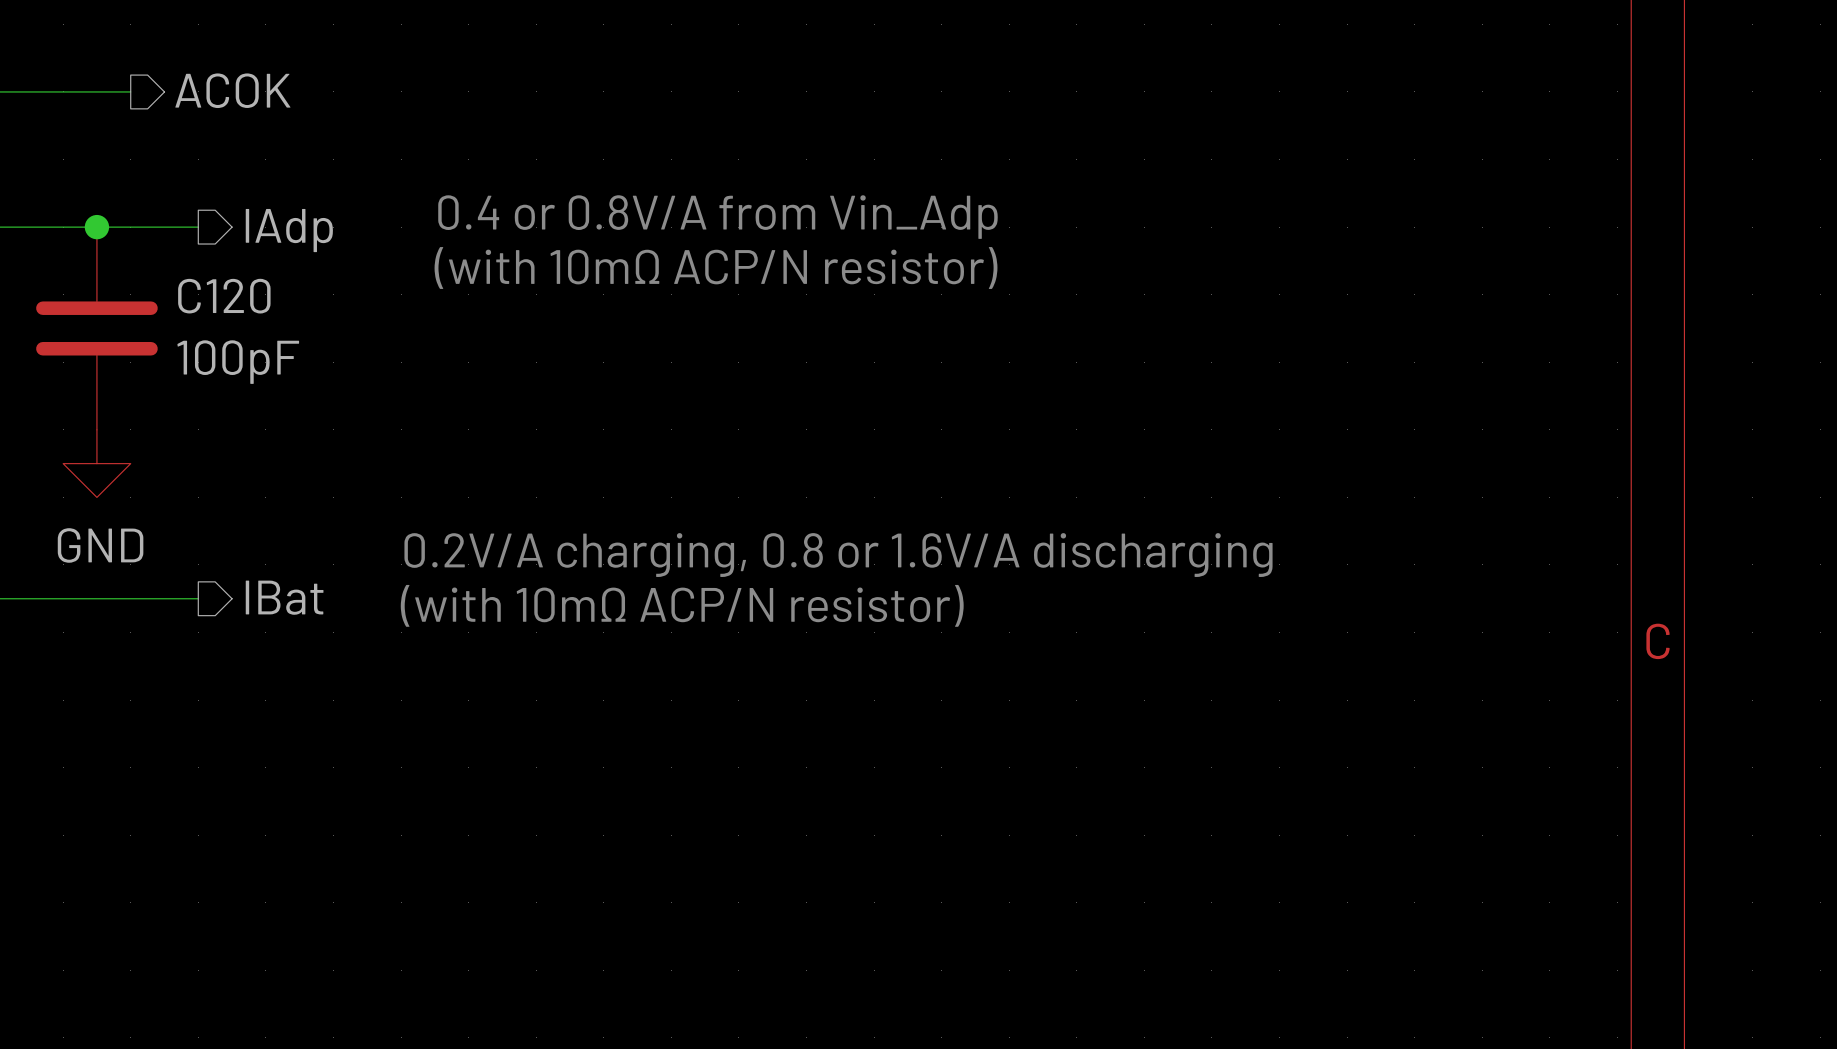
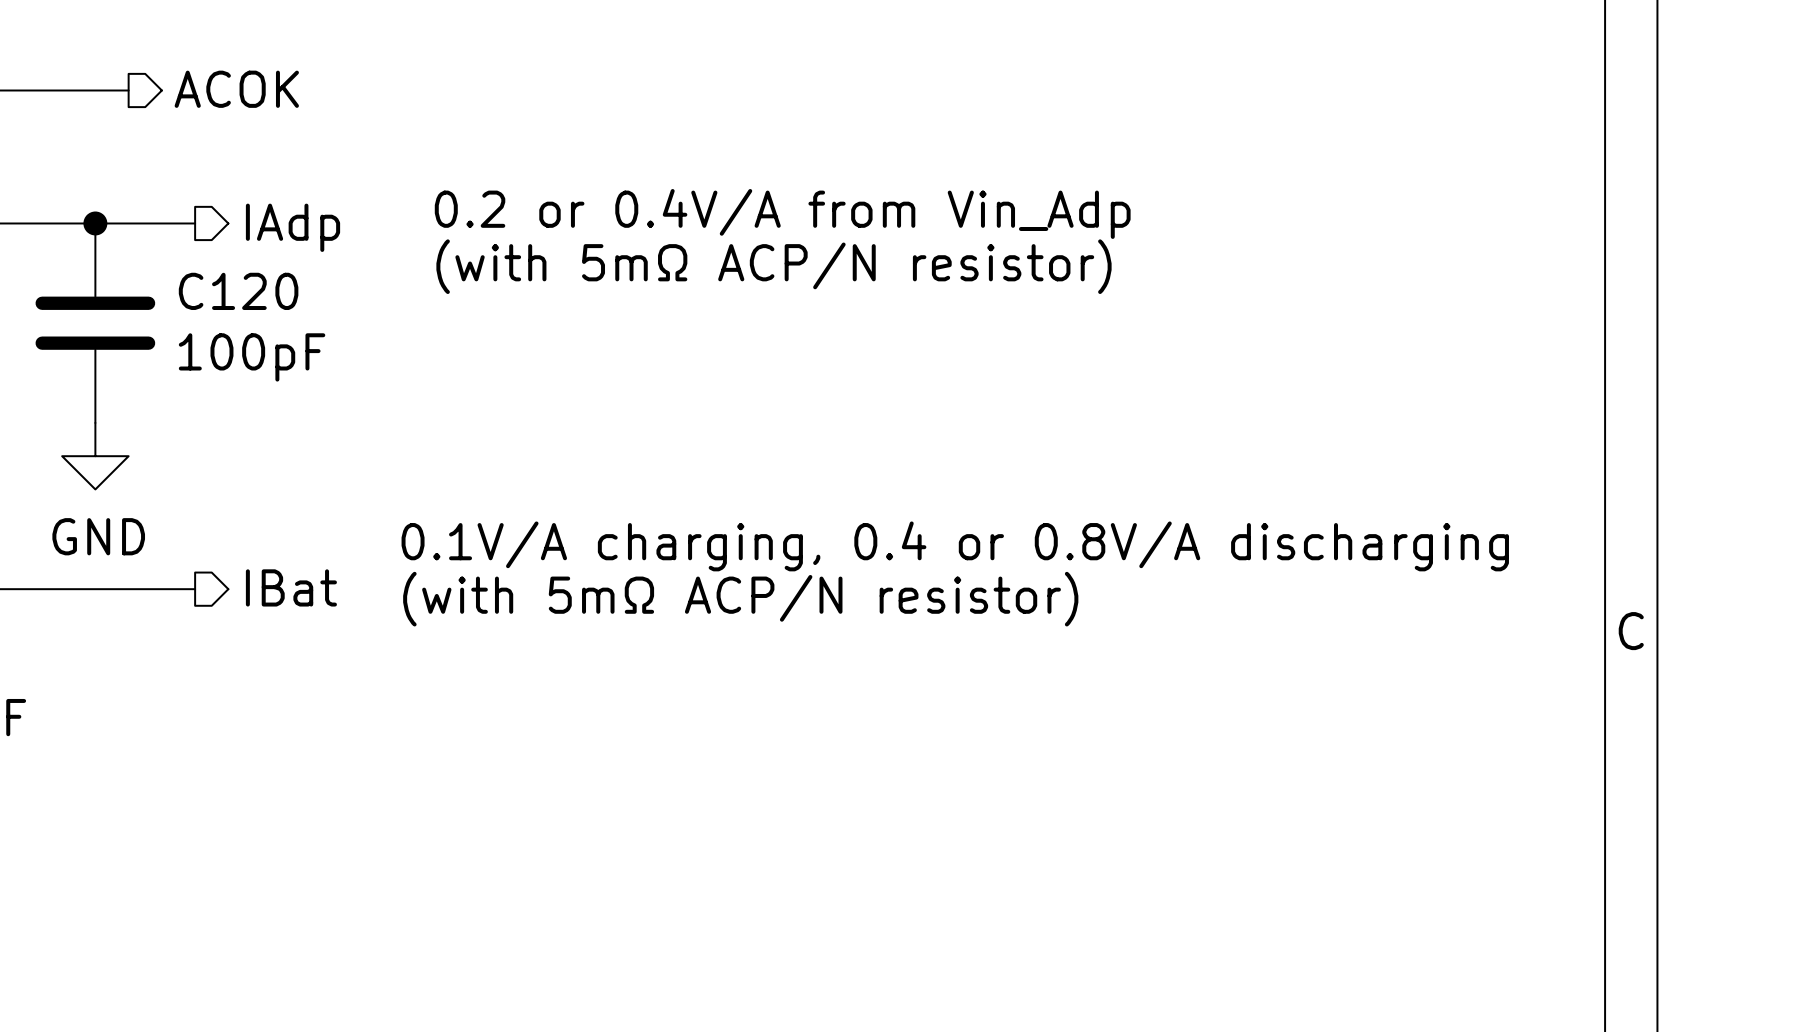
text: 0.4 or 0.8V/A from Vin_Adp (717, 217) -> 0.2 or 0.4V/A from Vin_Adp (782, 213)
text: (with 10mΩ ACP/N resistor) (716, 268) -> (with 5mΩ ACP/N resistor) (773, 266)
text: 0.2V/A charging, 0.8 or 1.6V/A discharging (838, 555) -> 0.1V/A charging, 0.4 or 0.8V/A discharging (955, 546)
text: (with 10mΩ ACP/N resistor) (682, 605) -> (with 5mΩ ACP/N resistor) (740, 599)

